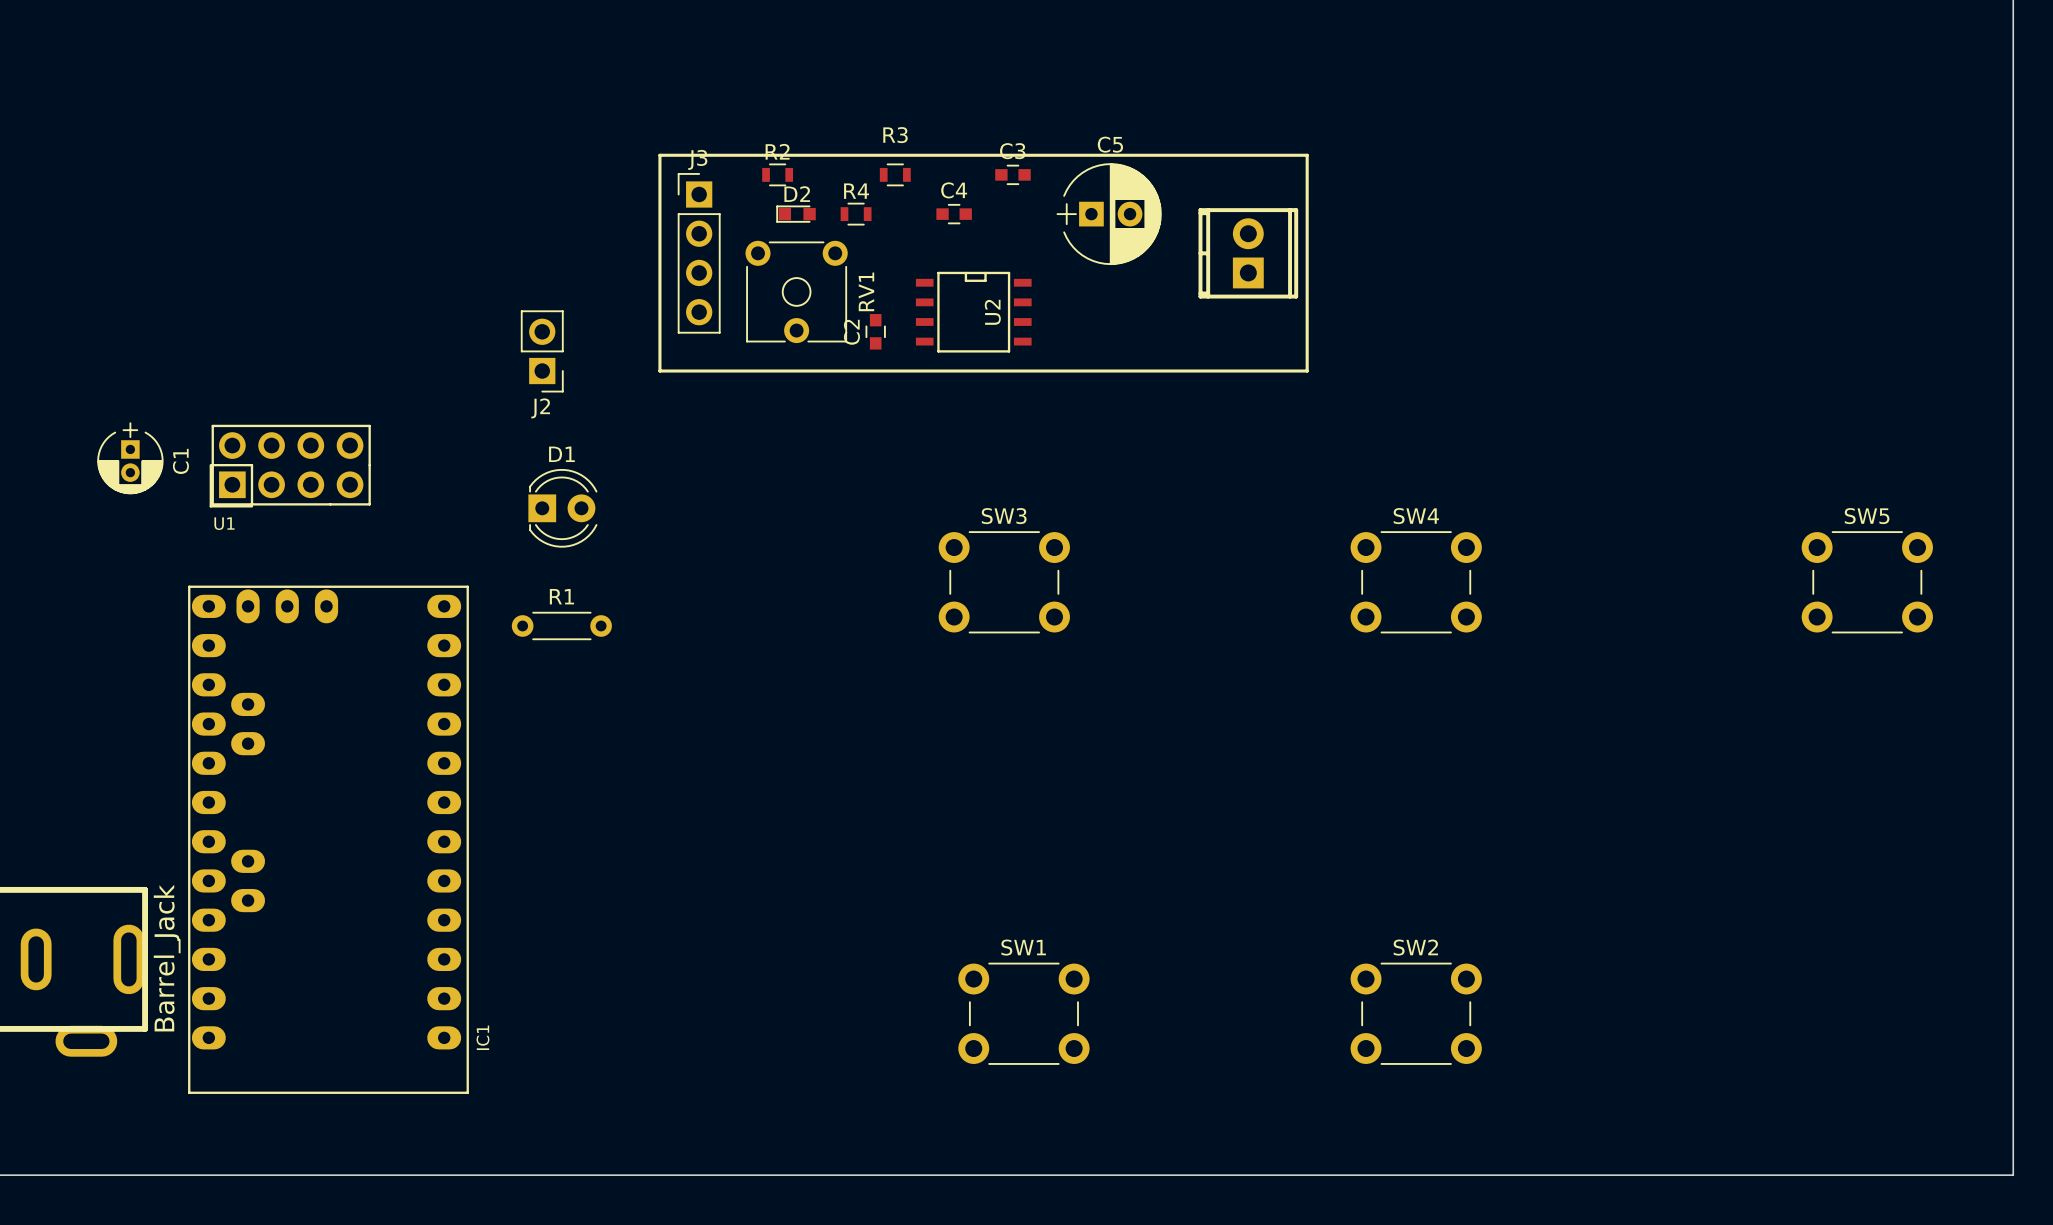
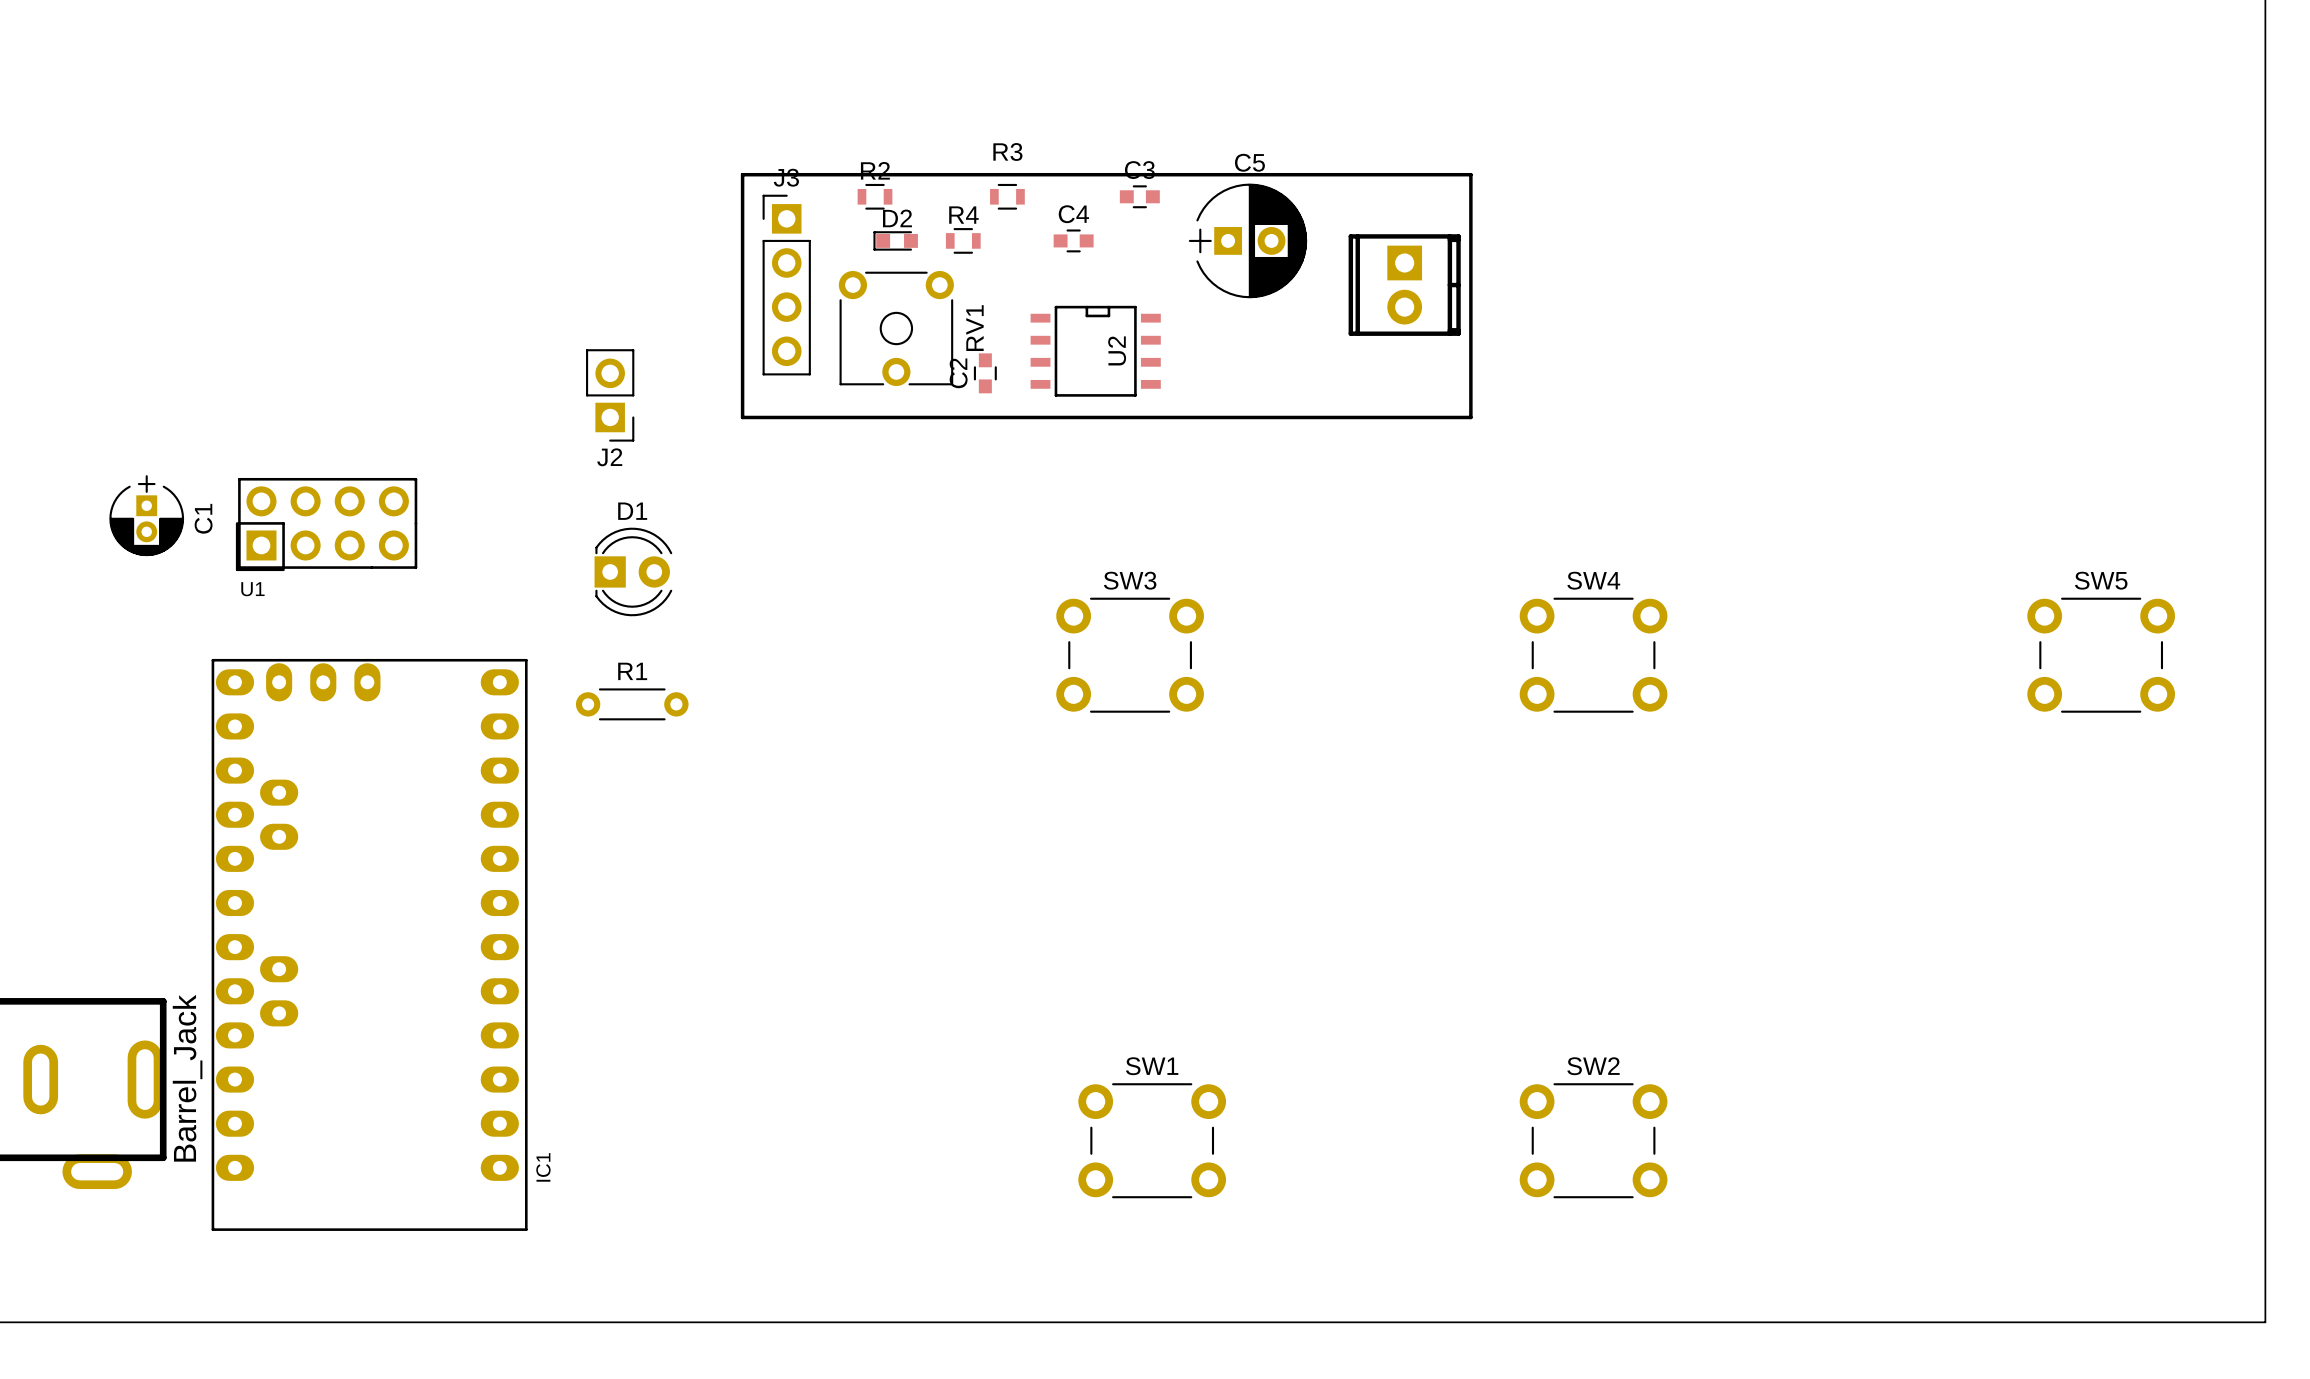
part rotation: 0° (1248, 253) -> 180° (1404, 285)

